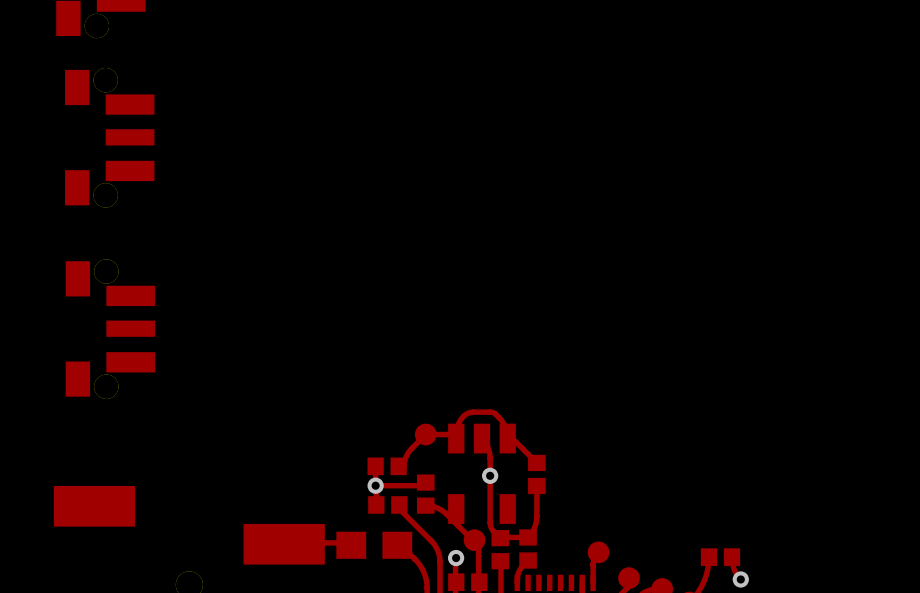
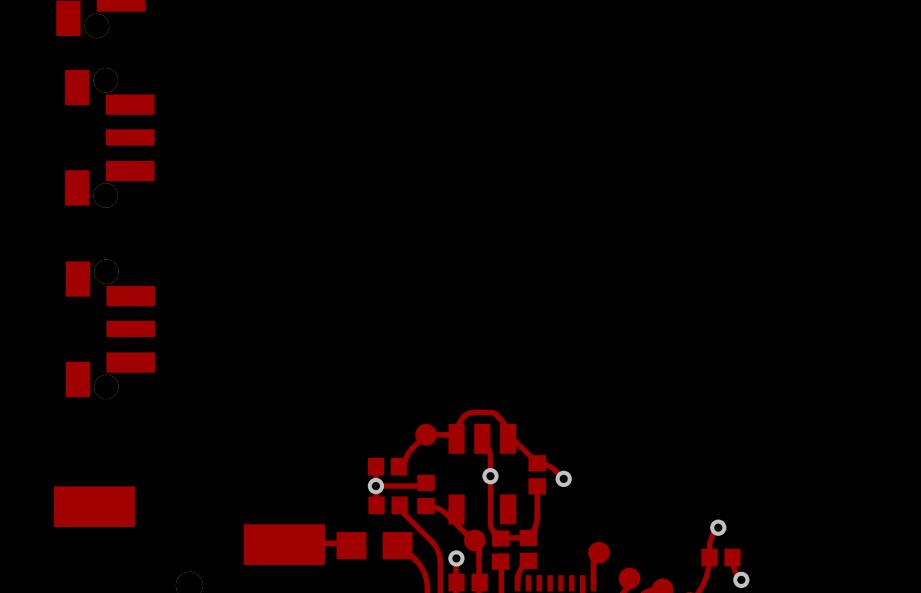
top track: none -> (537, 463) (549, 466) (563, 478)
via: none -> (563, 478)
top track: none -> (718, 527) (710, 541) (709, 557)
via: none -> (718, 527)

